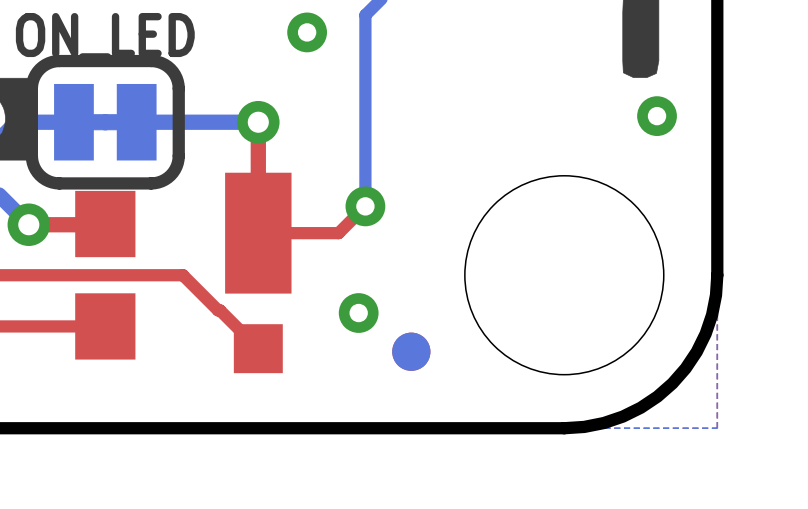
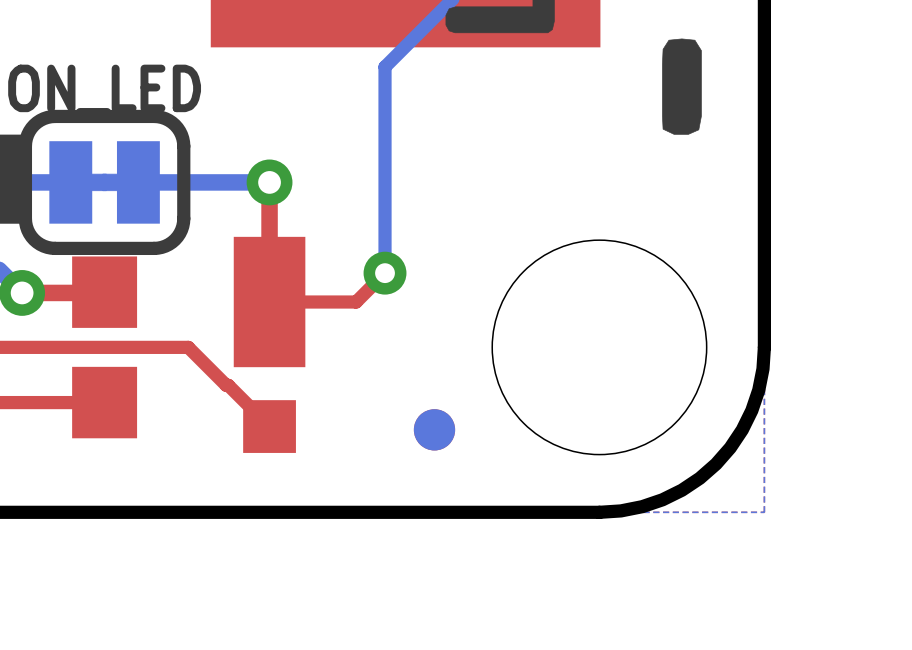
via: (307, 32) -> none
via: (657, 116) -> none
via: (358, 313) -> none

